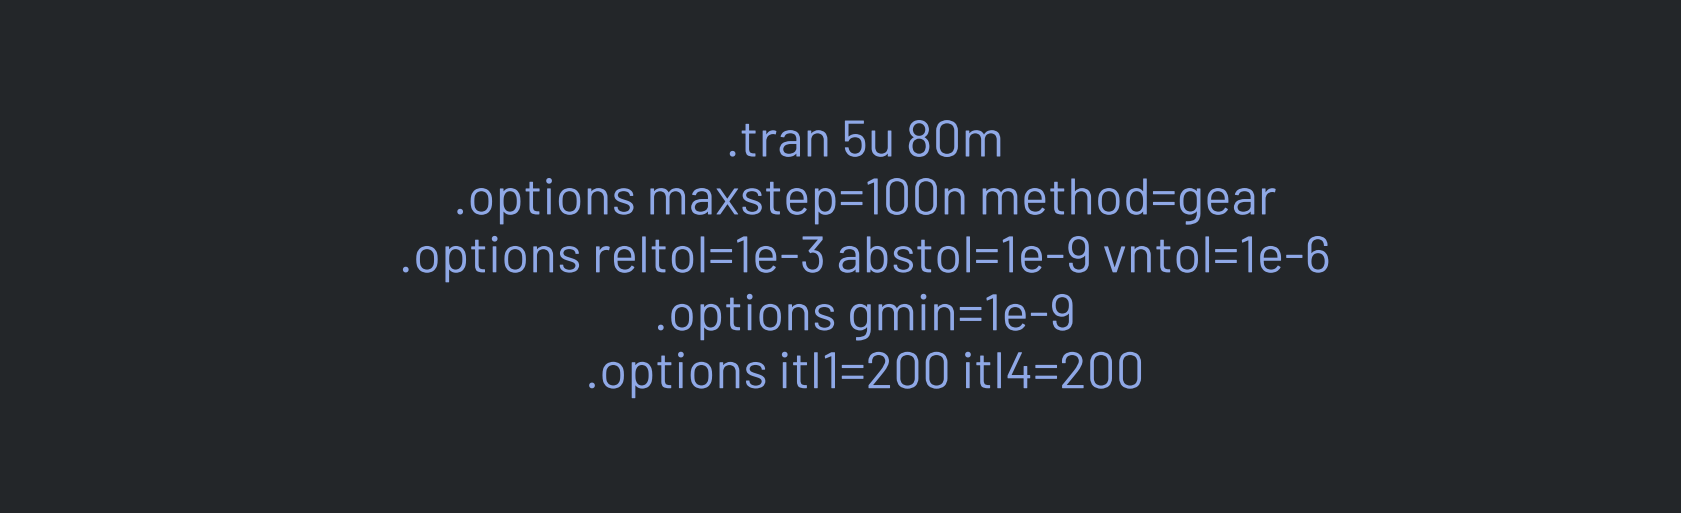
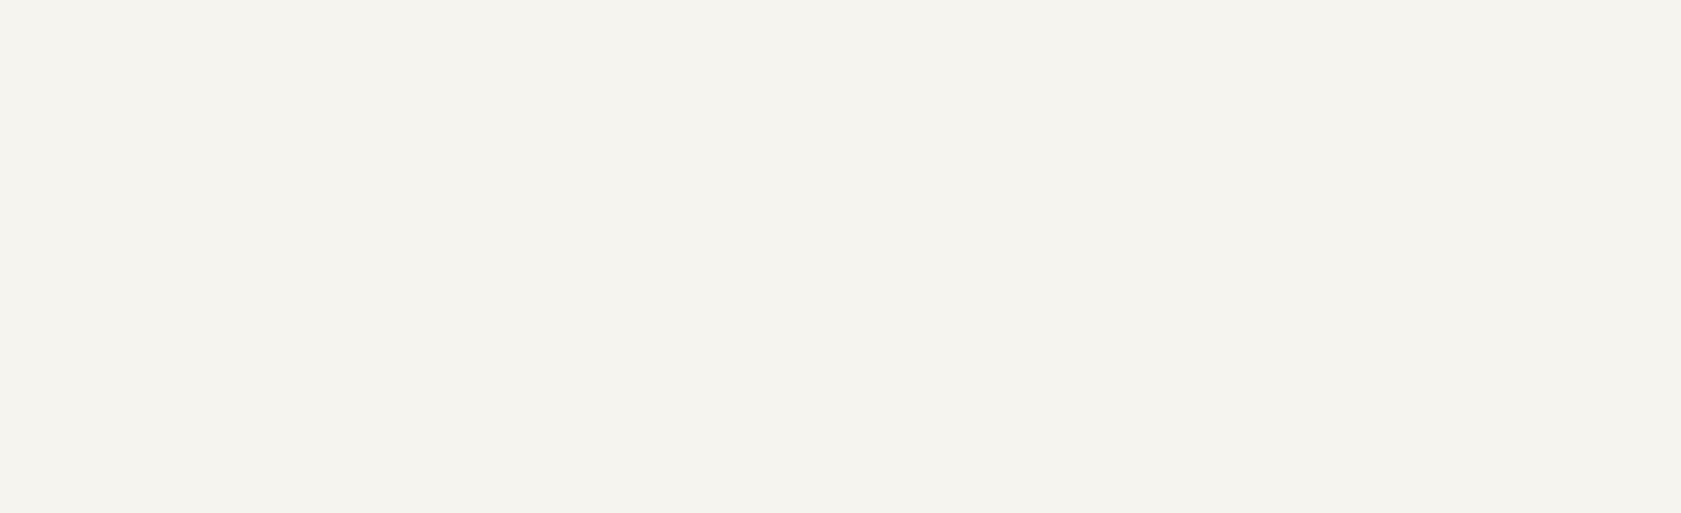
text: .tran 5u 80m (865, 138) -> none
text: .options maxstep=100n method=gear (866, 201) -> none
text: .options reltol=1e-3 abstol=1e-9 vntol=1e-6 (865, 259) -> none
text: .options gmin=1e-9 (865, 317) -> none
text: .options itl1=200 itl4=200 (865, 374) -> none

